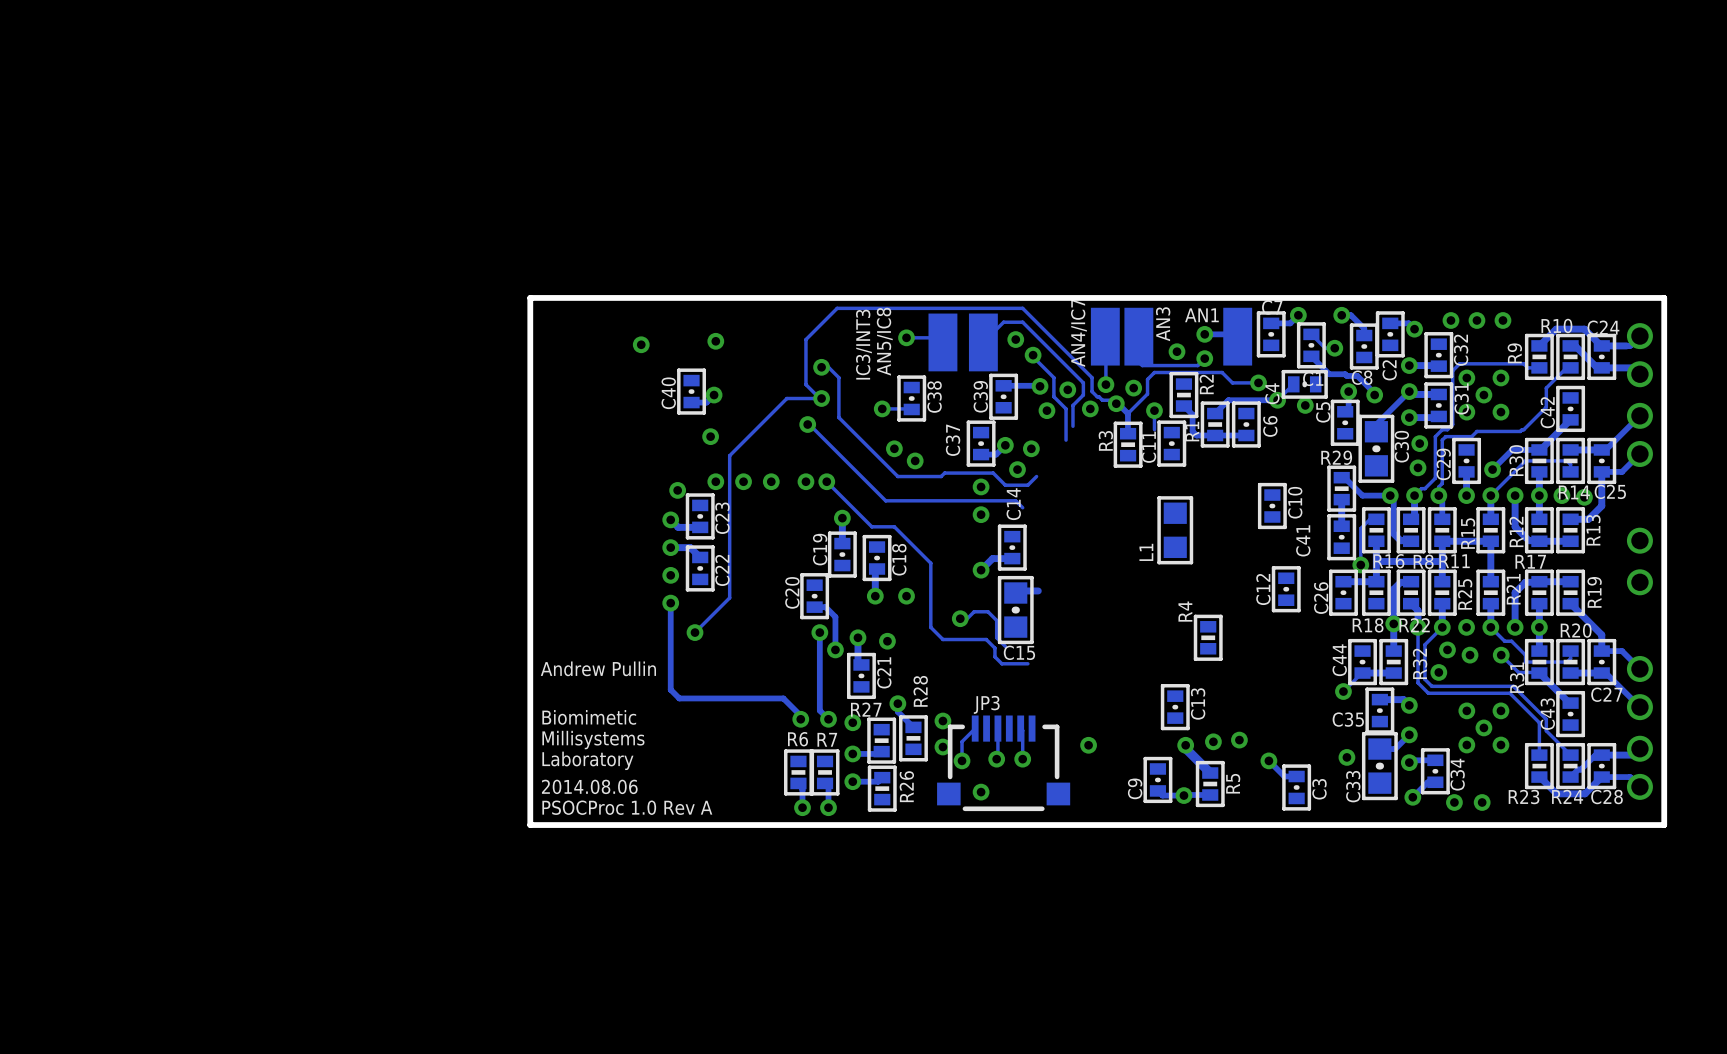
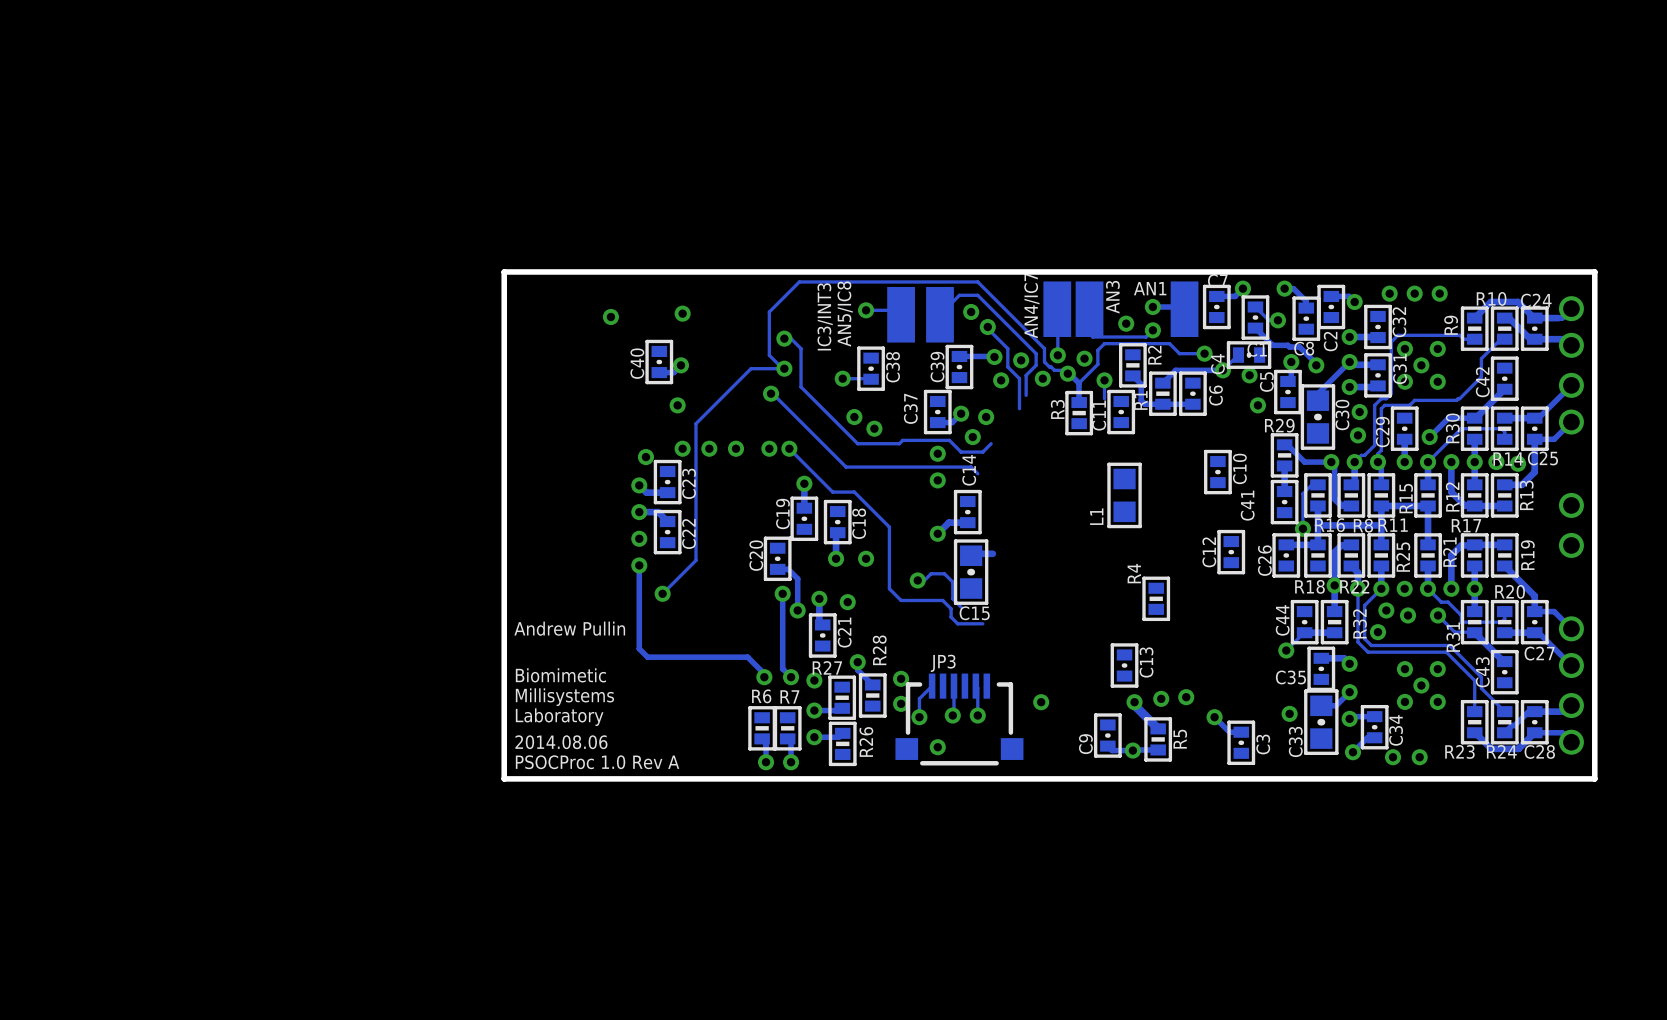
via: none -> (1257, 405)

